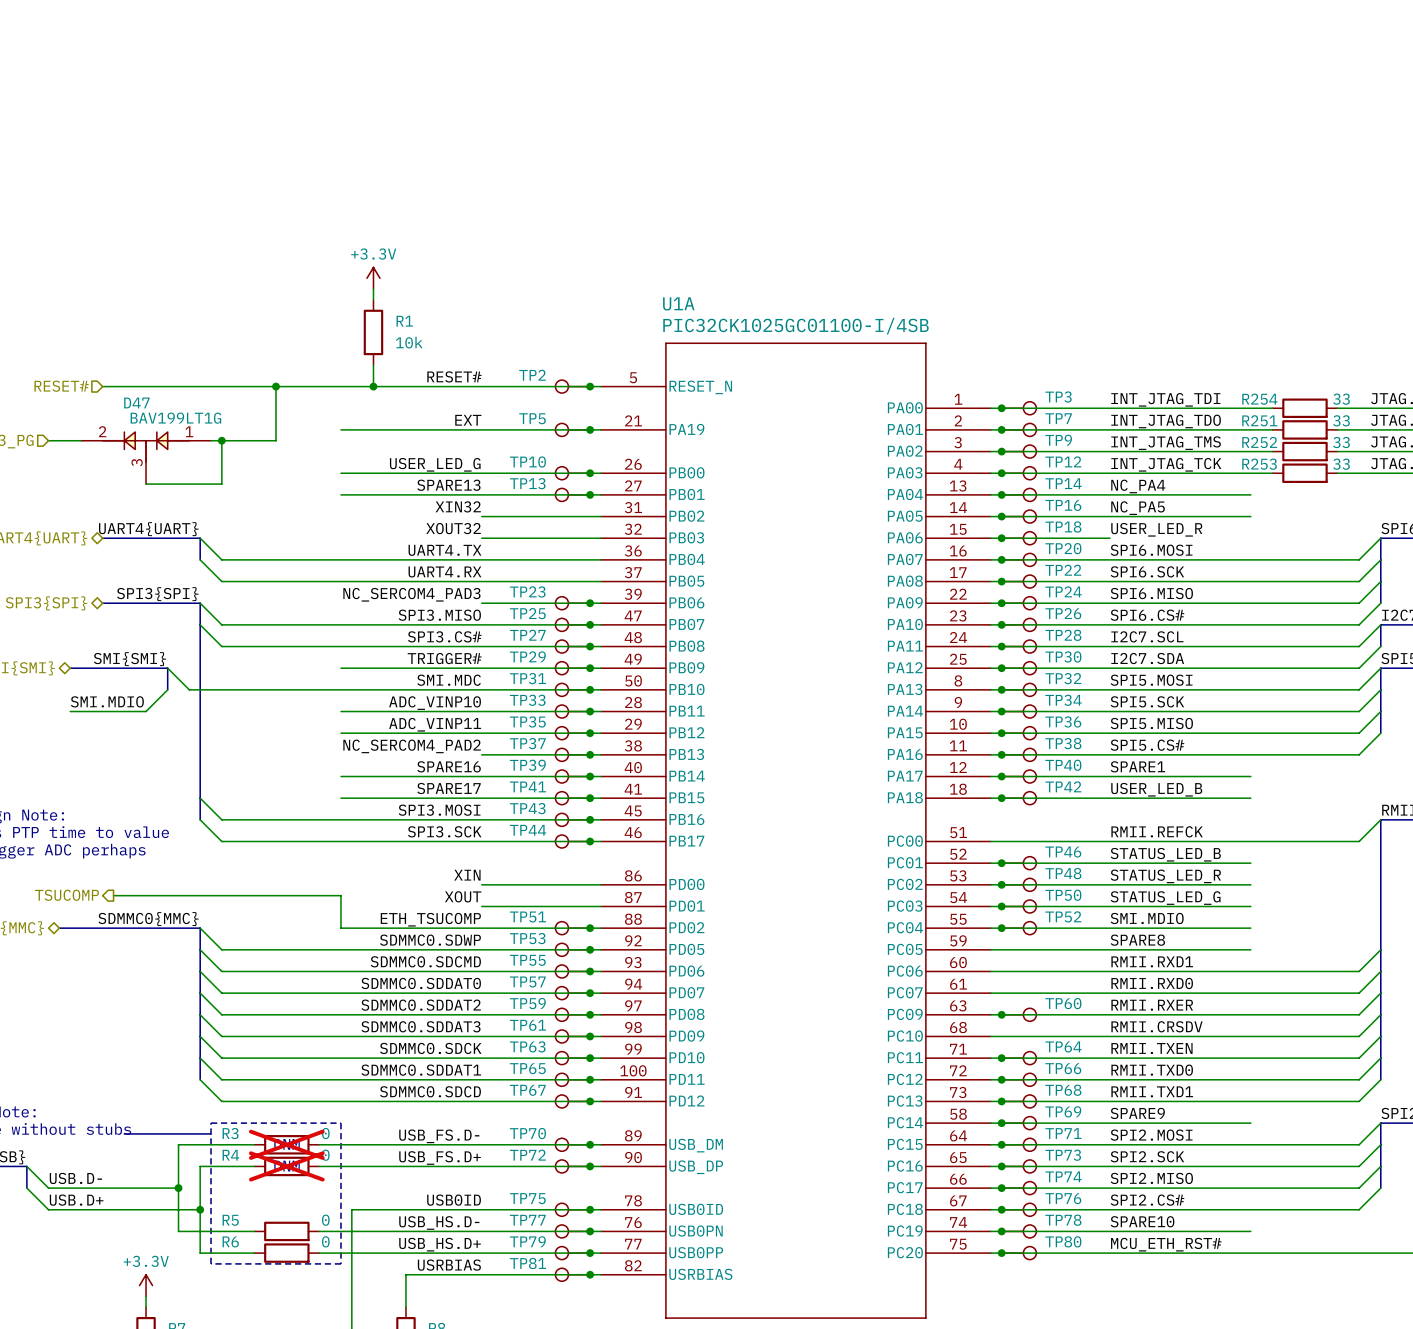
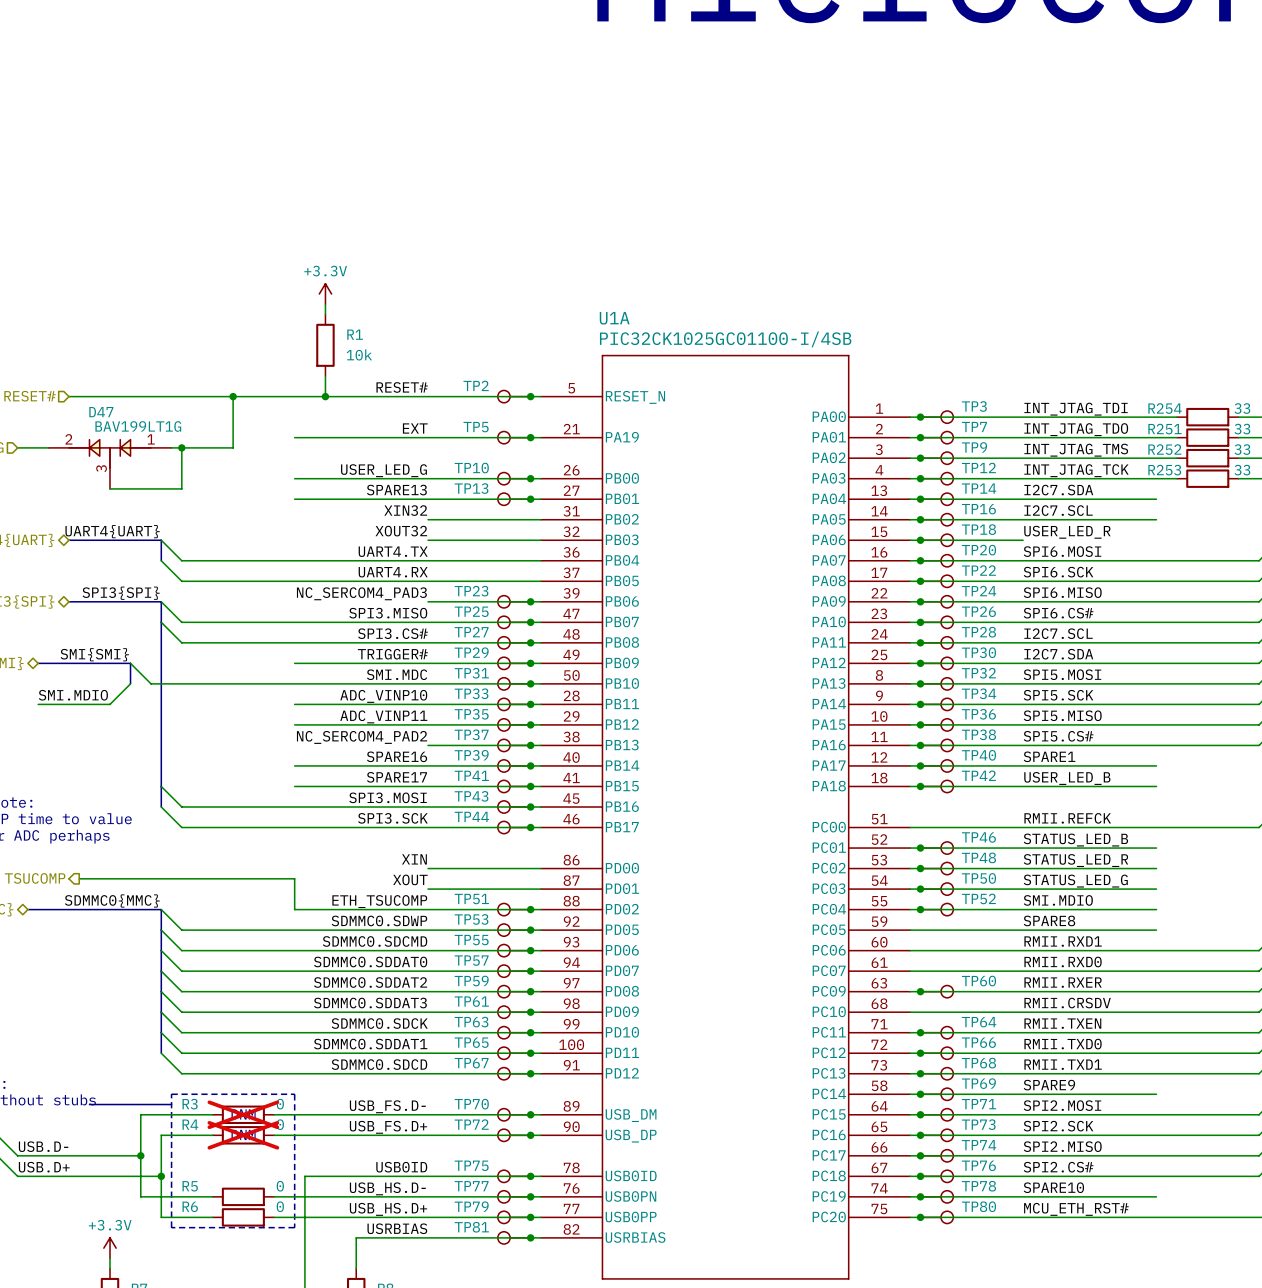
label: NC_PA4 (1138, 486) -> I2C7.SDA (1058, 490)
label: NC_PA5 (1138, 508) -> I2C7.SCL (1058, 510)

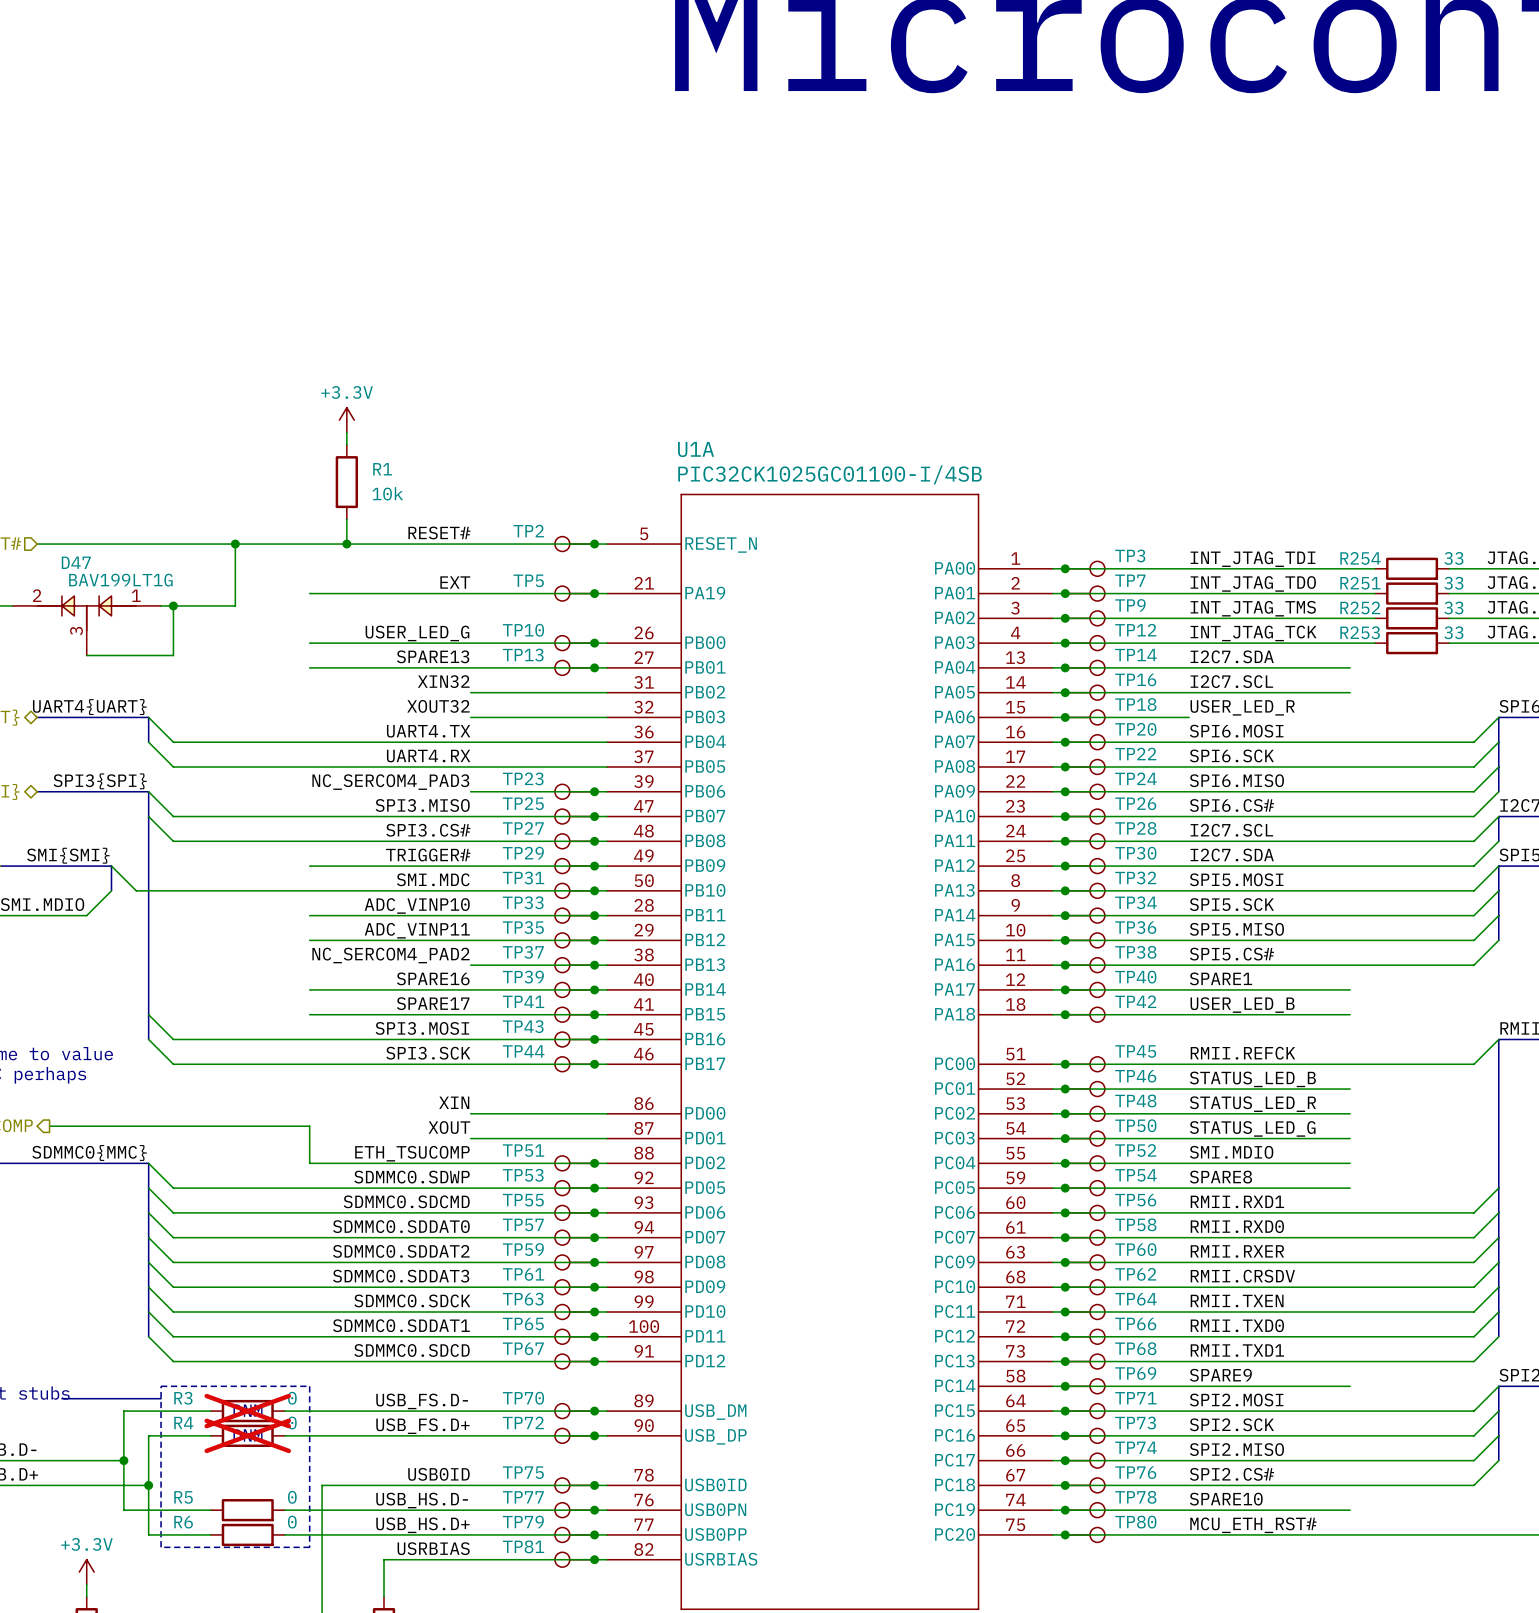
junction: none -> (1065, 1064)
TP45: none -> (1085, 1064)
junction: none -> (1065, 1188)
TP54: none -> (1085, 1188)
junction: none -> (1065, 1212)
TP56: none -> (1085, 1212)
junction: none -> (1065, 1237)
TP58: none -> (1085, 1237)
junction: none -> (1065, 1287)
TP62: none -> (1085, 1287)

